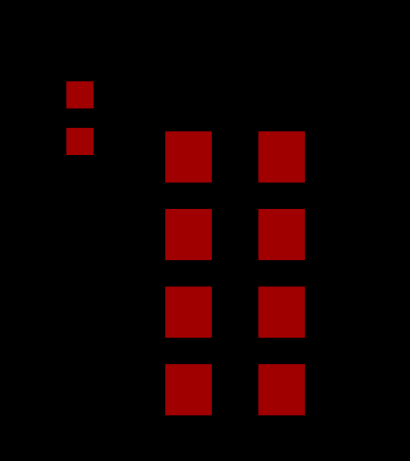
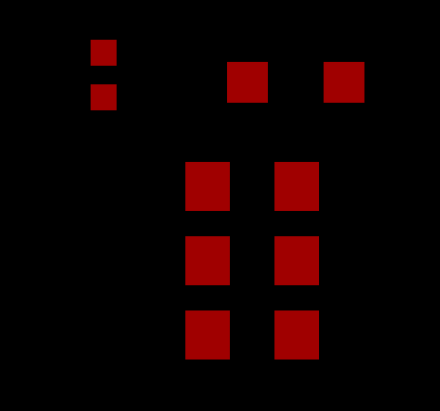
part: none -> (295, 82)
part: (235, 156) -> none

